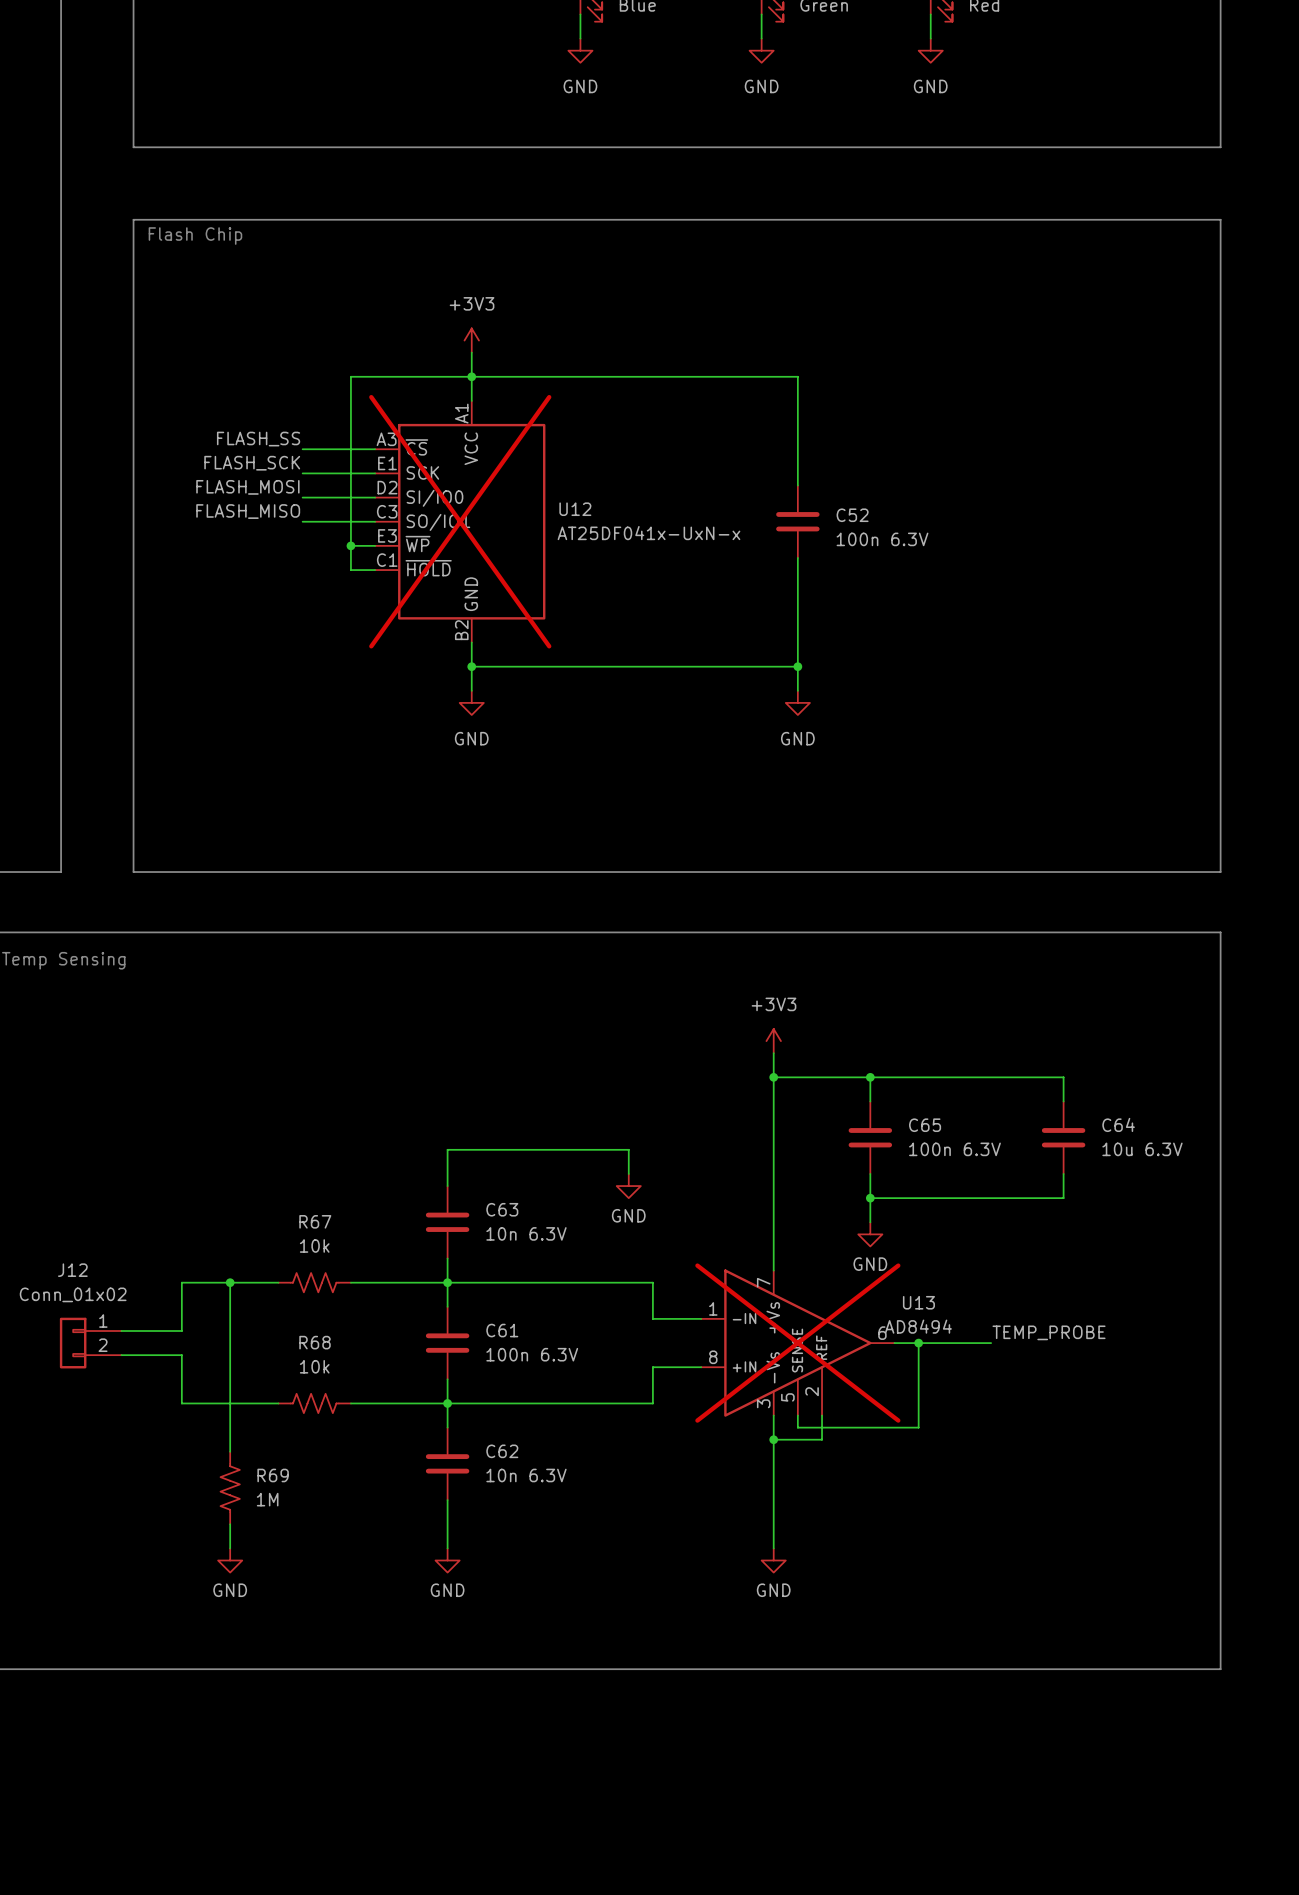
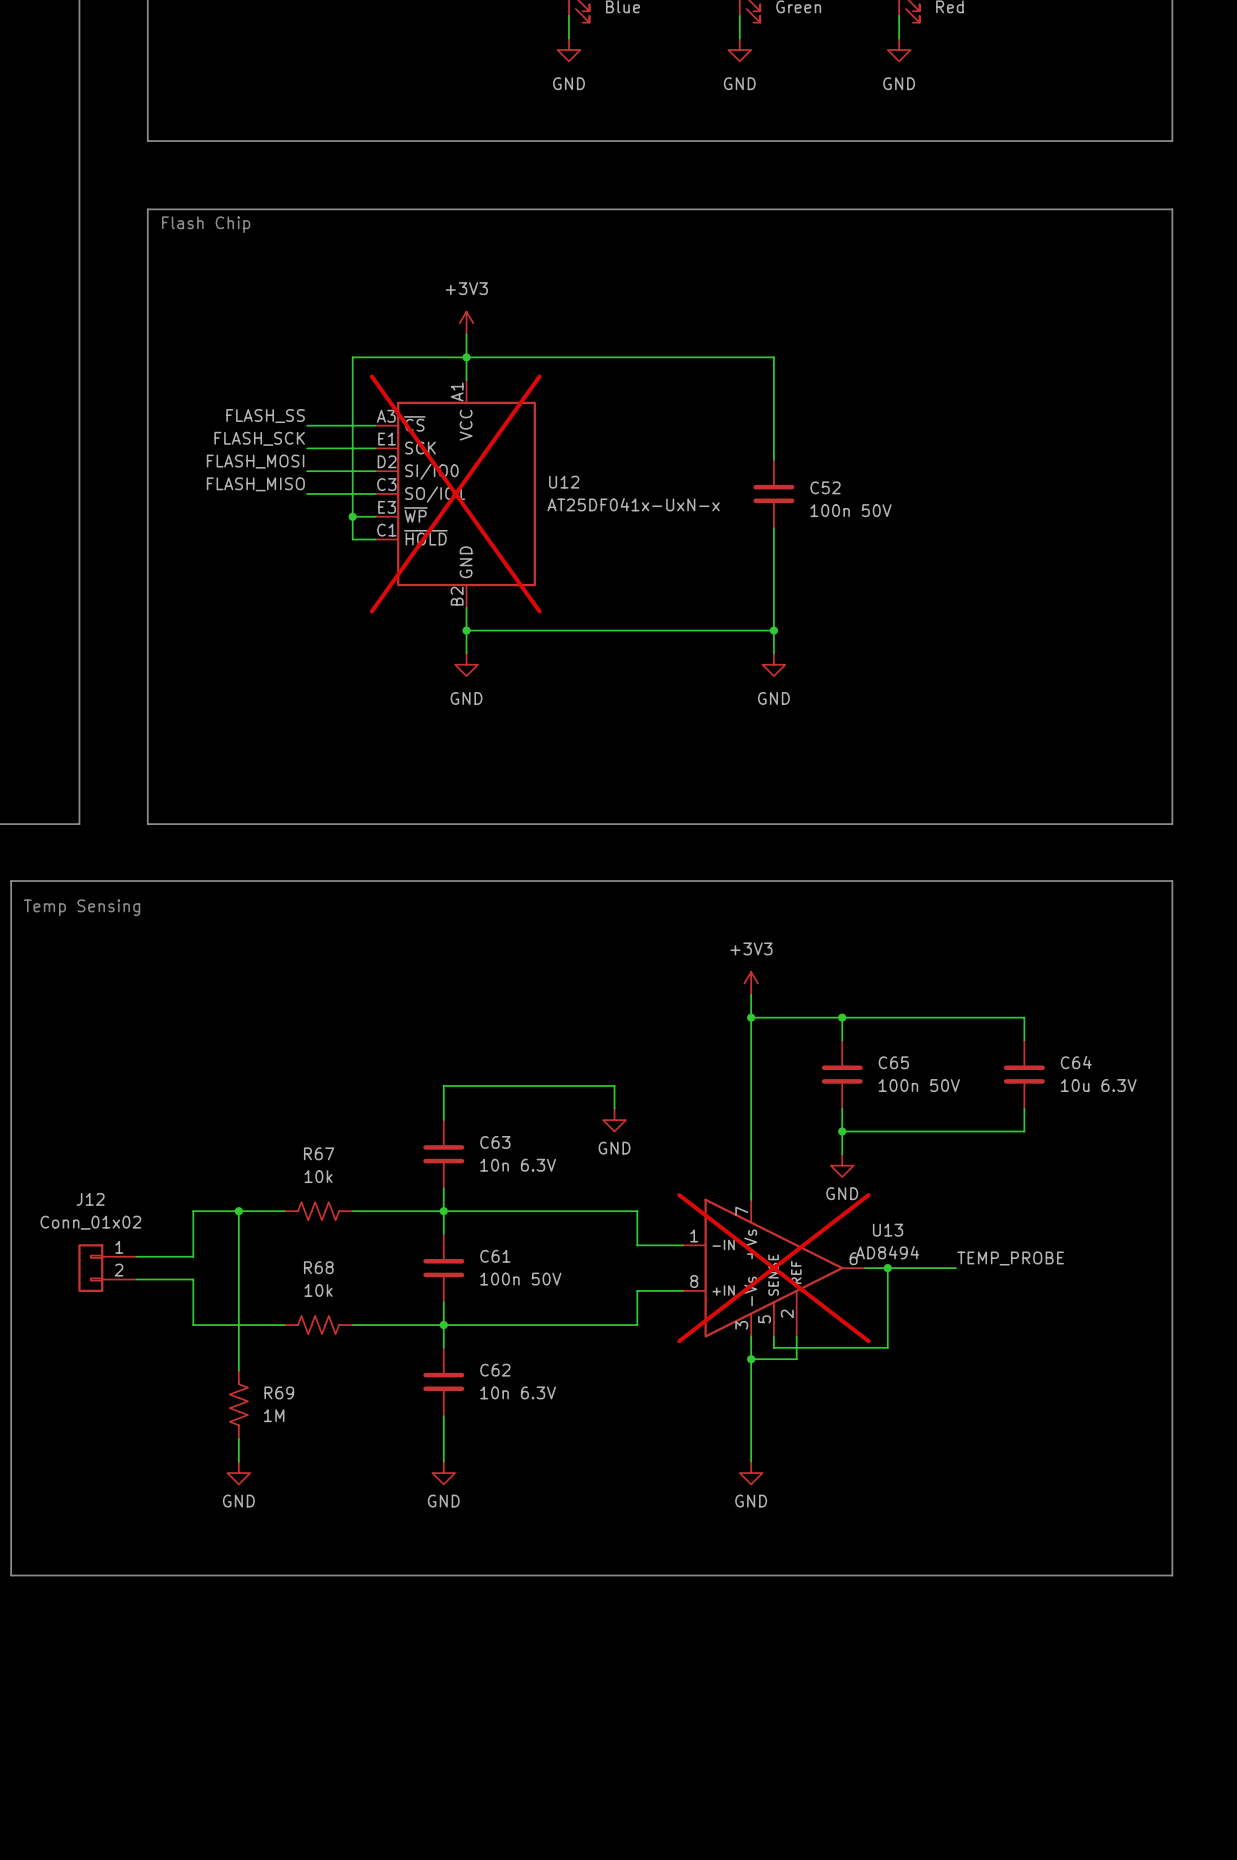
C52 value: 100n 6.3V (882, 539) -> 100n 50V (850, 510)
C65 value: 100n 6.3V (954, 1149) -> 100n 50V (919, 1085)
C61 value: 100n 6.3V (532, 1354) -> 100n 50V (520, 1279)

